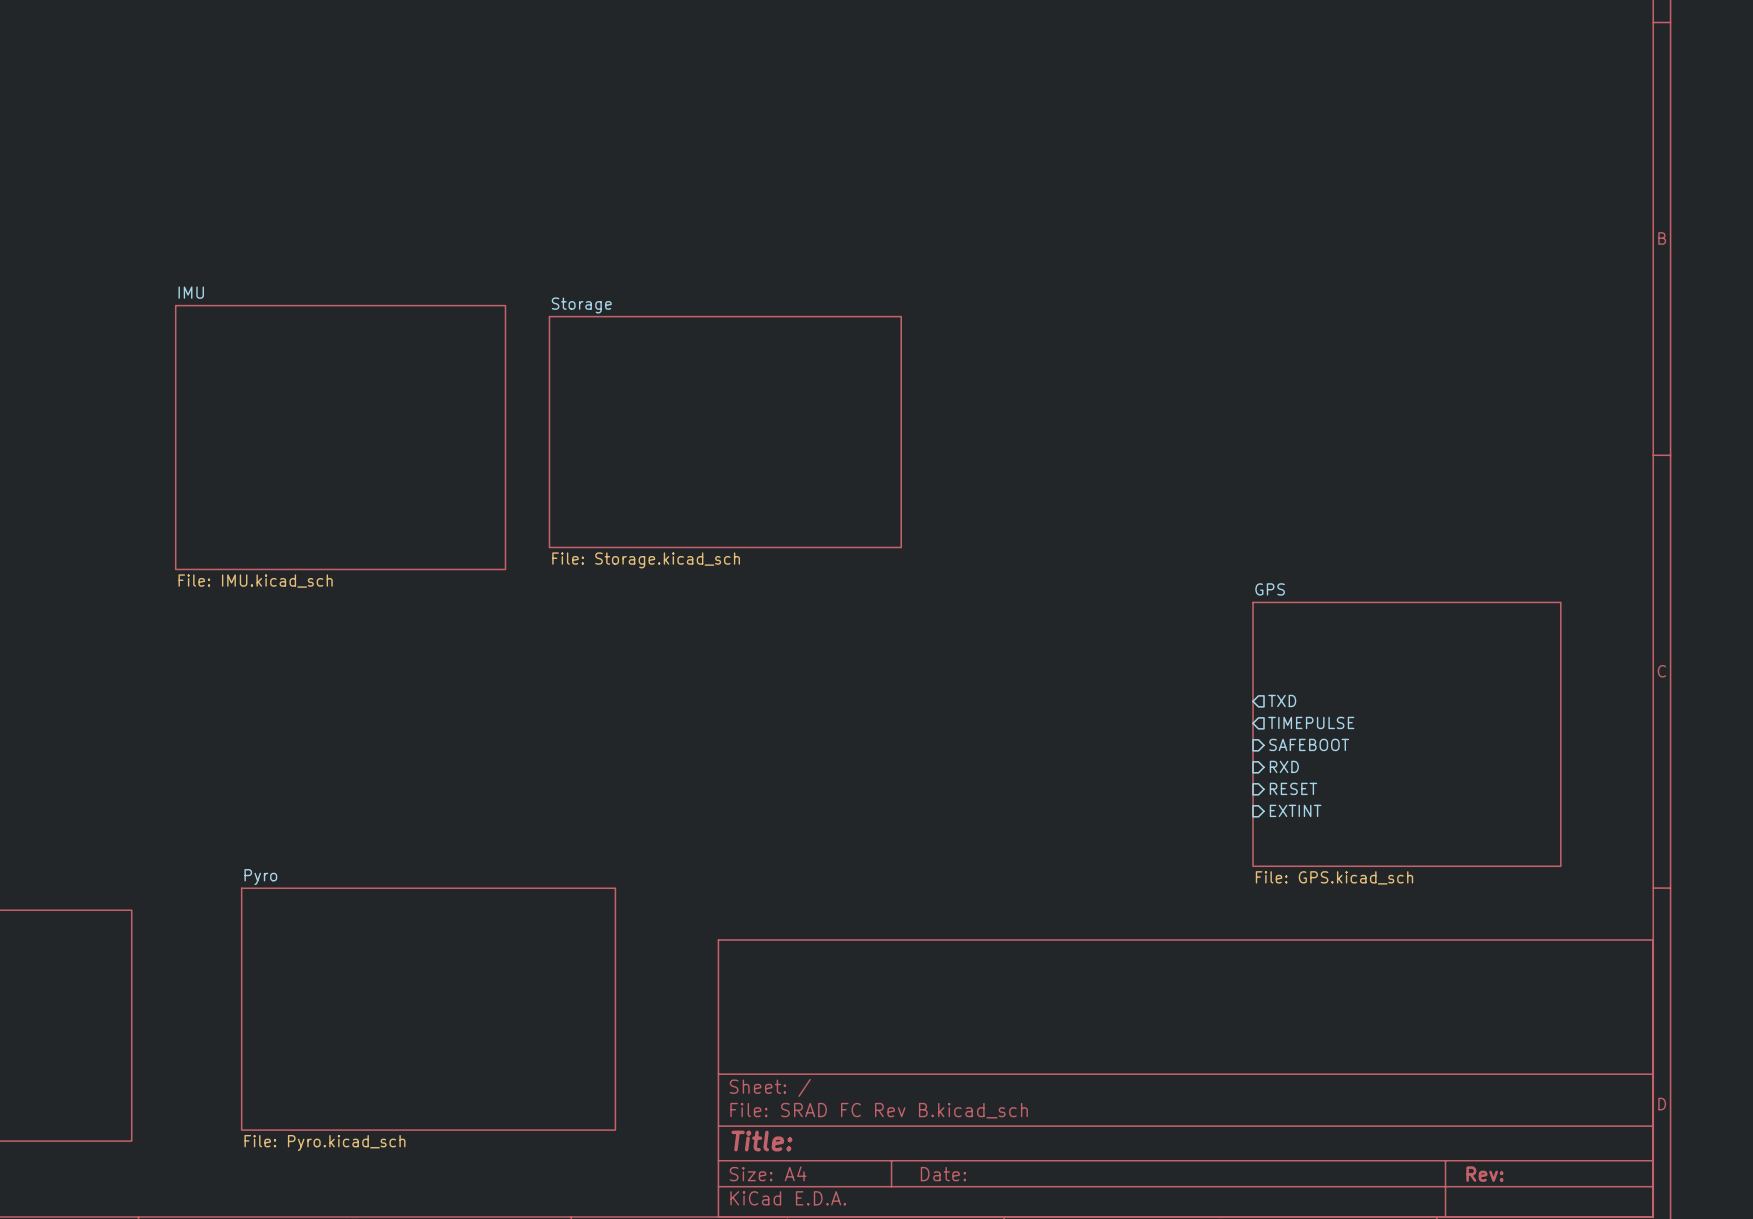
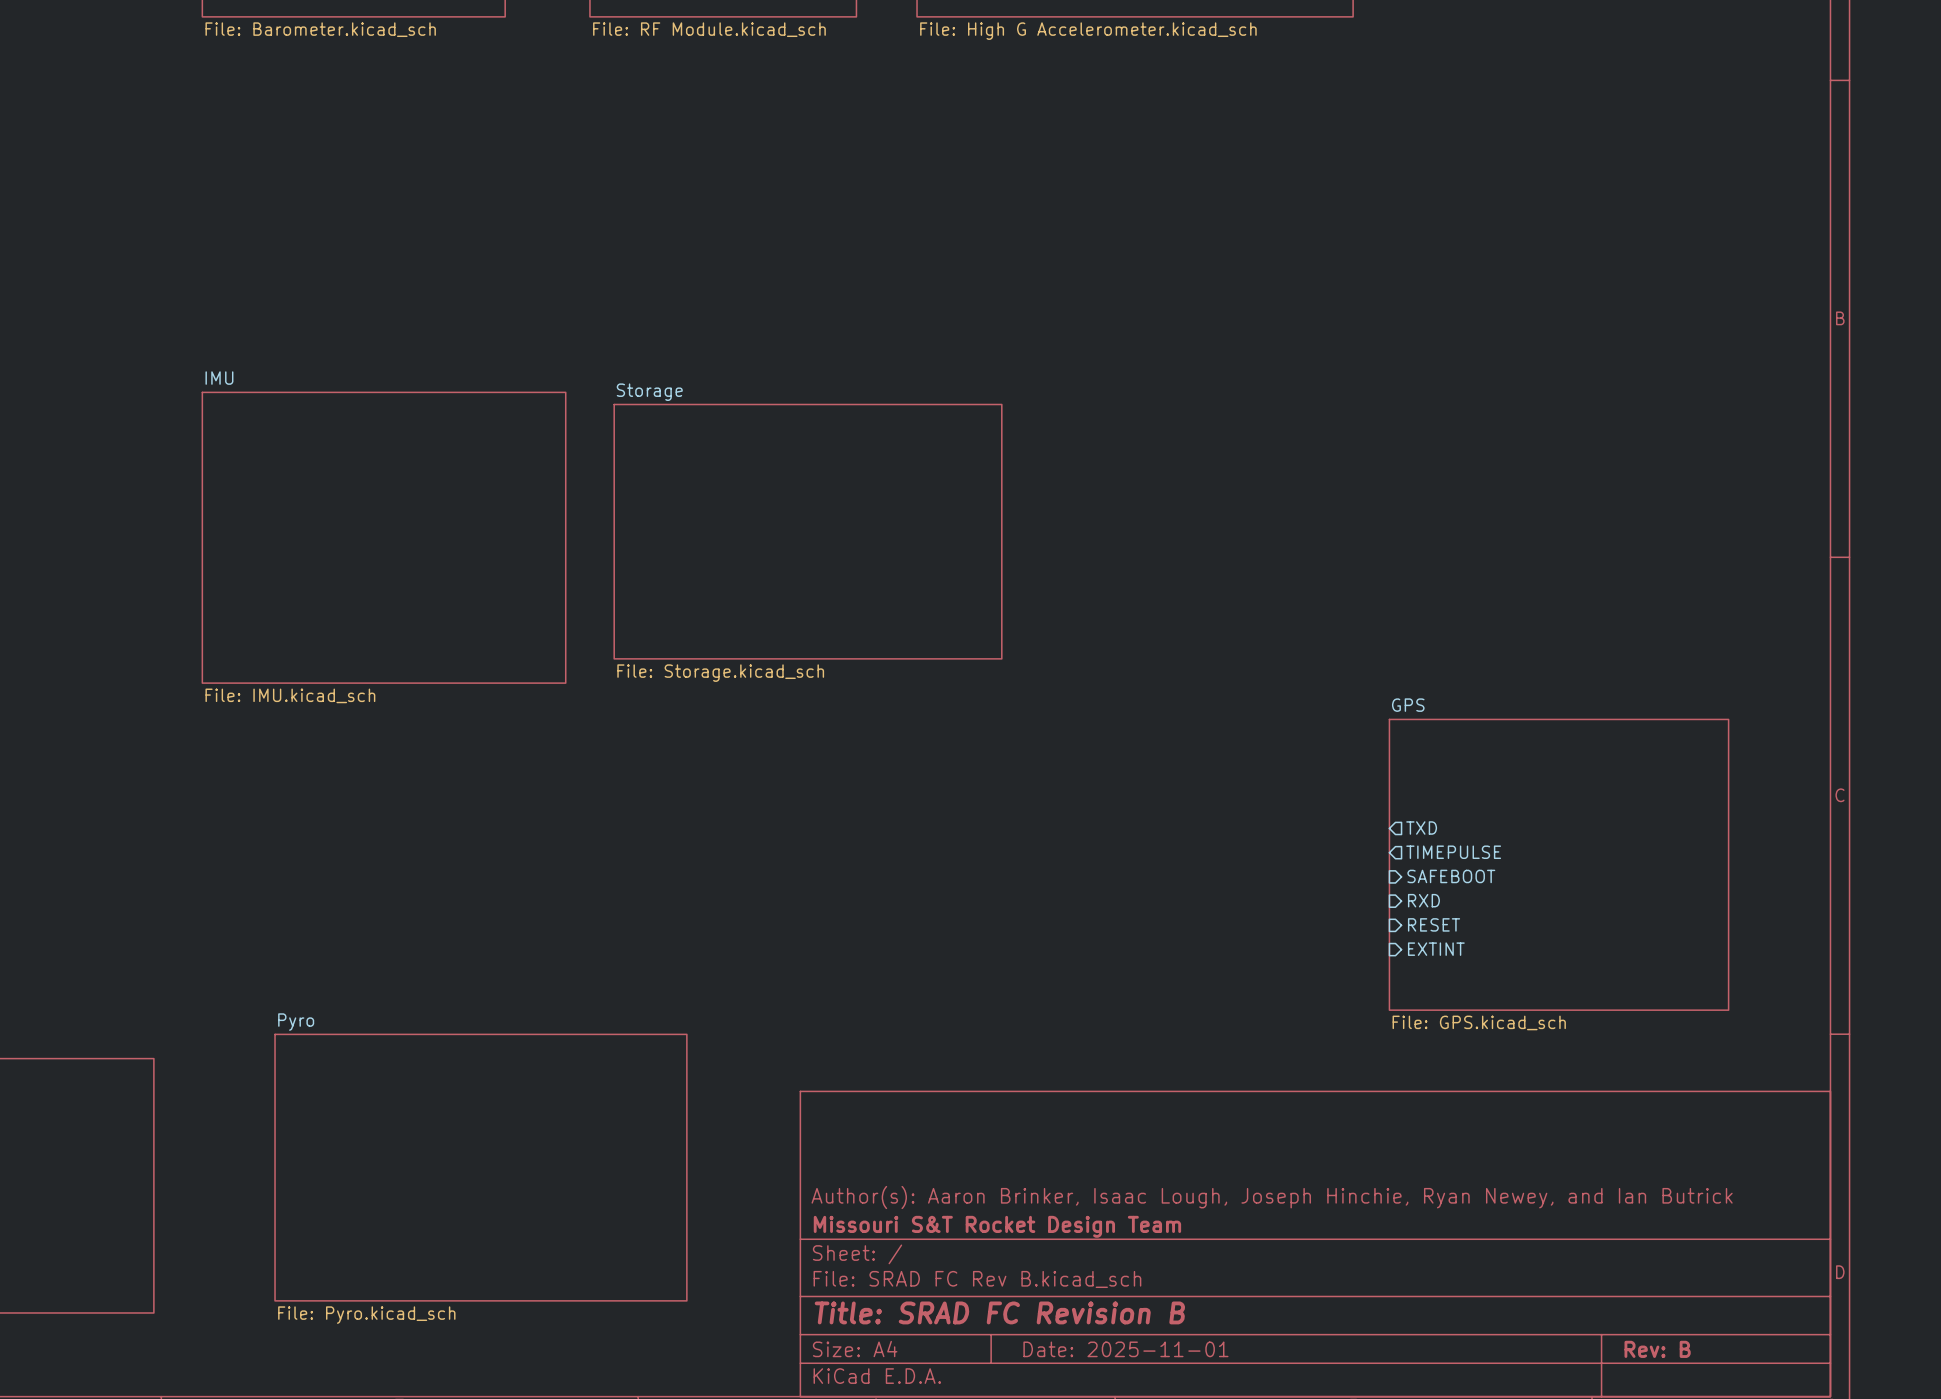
title block: none -> Author(s): Aaron Brinker, Isaac Lough, Joseph Hinchie, Ryan Newey, and Ian Butrick (1272, 1197)
title block: none -> Missouri S&T Rocket Design Team (997, 1226)
title block: Title: (761, 1141) -> Title: SRAD FC Revision B (999, 1312)
title block: Date: (943, 1174) -> Date: 2025-11-01 (1125, 1349)
title block: Rev: (1484, 1174) -> Rev: B (1657, 1349)

